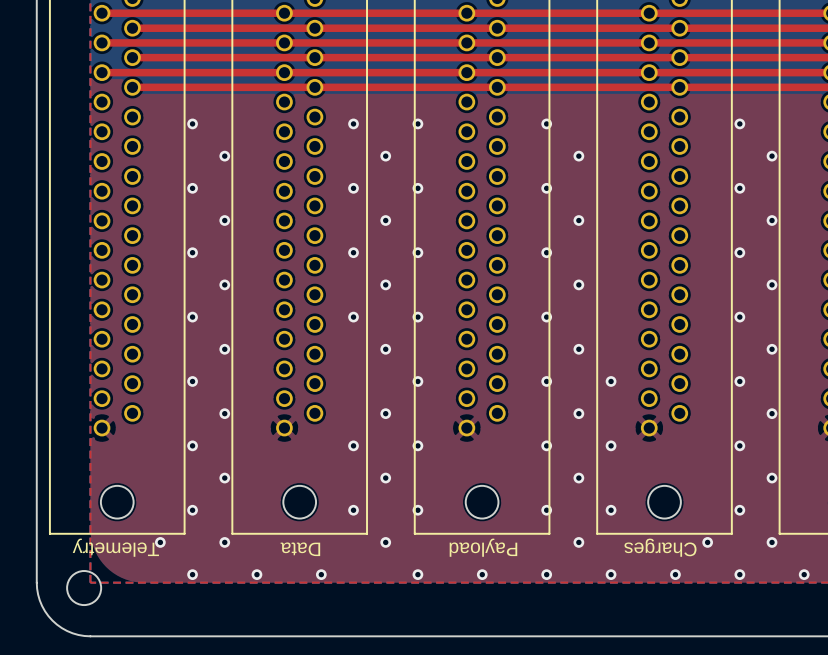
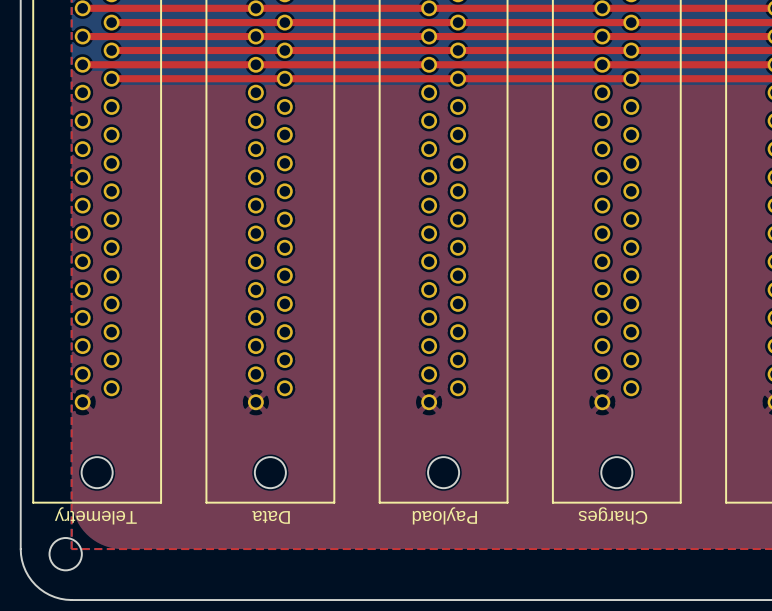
via: (192, 123) -> none
via: (353, 123) -> none
via: (417, 123) -> none
via: (546, 123) -> none
via: (739, 123) -> none
via: (224, 156) -> none
via: (385, 156) -> none
via: (578, 156) -> none
via: (772, 156) -> none
via: (192, 188) -> none
via: (353, 188) -> none
via: (417, 188) -> none
via: (546, 188) -> none
via: (739, 188) -> none
via: (224, 220) -> none
via: (385, 220) -> none
via: (578, 220) -> none
via: (772, 220) -> none
via: (192, 252) -> none
via: (353, 252) -> none
via: (417, 252) -> none
via: (546, 252) -> none
via: (739, 252) -> none
via: (224, 284) -> none
via: (385, 284) -> none
via: (578, 284) -> none
via: (772, 284) -> none
via: (192, 317) -> none
via: (353, 317) -> none
via: (417, 317) -> none
via: (546, 317) -> none
via: (739, 317) -> none
via: (224, 349) -> none
via: (385, 349) -> none
via: (578, 349) -> none
via: (772, 349) -> none
via: (192, 381) -> none
via: (417, 381) -> none
via: (546, 381) -> none
via: (611, 381) -> none
via: (739, 381) -> none
via: (224, 413) -> none
via: (385, 413) -> none
via: (578, 413) -> none
via: (772, 413) -> none
via: (192, 445) -> none
via: (353, 445) -> none
via: (417, 445) -> none
via: (546, 445) -> none
via: (611, 445) -> none
via: (739, 445) -> none
via: (224, 478) -> none
via: (385, 478) -> none
via: (578, 478) -> none
via: (772, 478) -> none
via: (192, 510) -> none
via: (353, 510) -> none
via: (417, 510) -> none
via: (546, 510) -> none
via: (611, 510) -> none
via: (739, 510) -> none
via: (160, 542) -> none
via: (224, 542) -> none
via: (385, 542) -> none
via: (578, 542) -> none
via: (707, 542) -> none
via: (772, 542) -> none
via: (192, 574) -> none
via: (256, 574) -> none
via: (321, 574) -> none
via: (417, 574) -> none
via: (482, 574) -> none
via: (546, 574) -> none
via: (611, 574) -> none
via: (675, 574) -> none
via: (739, 574) -> none
via: (804, 574) -> none

